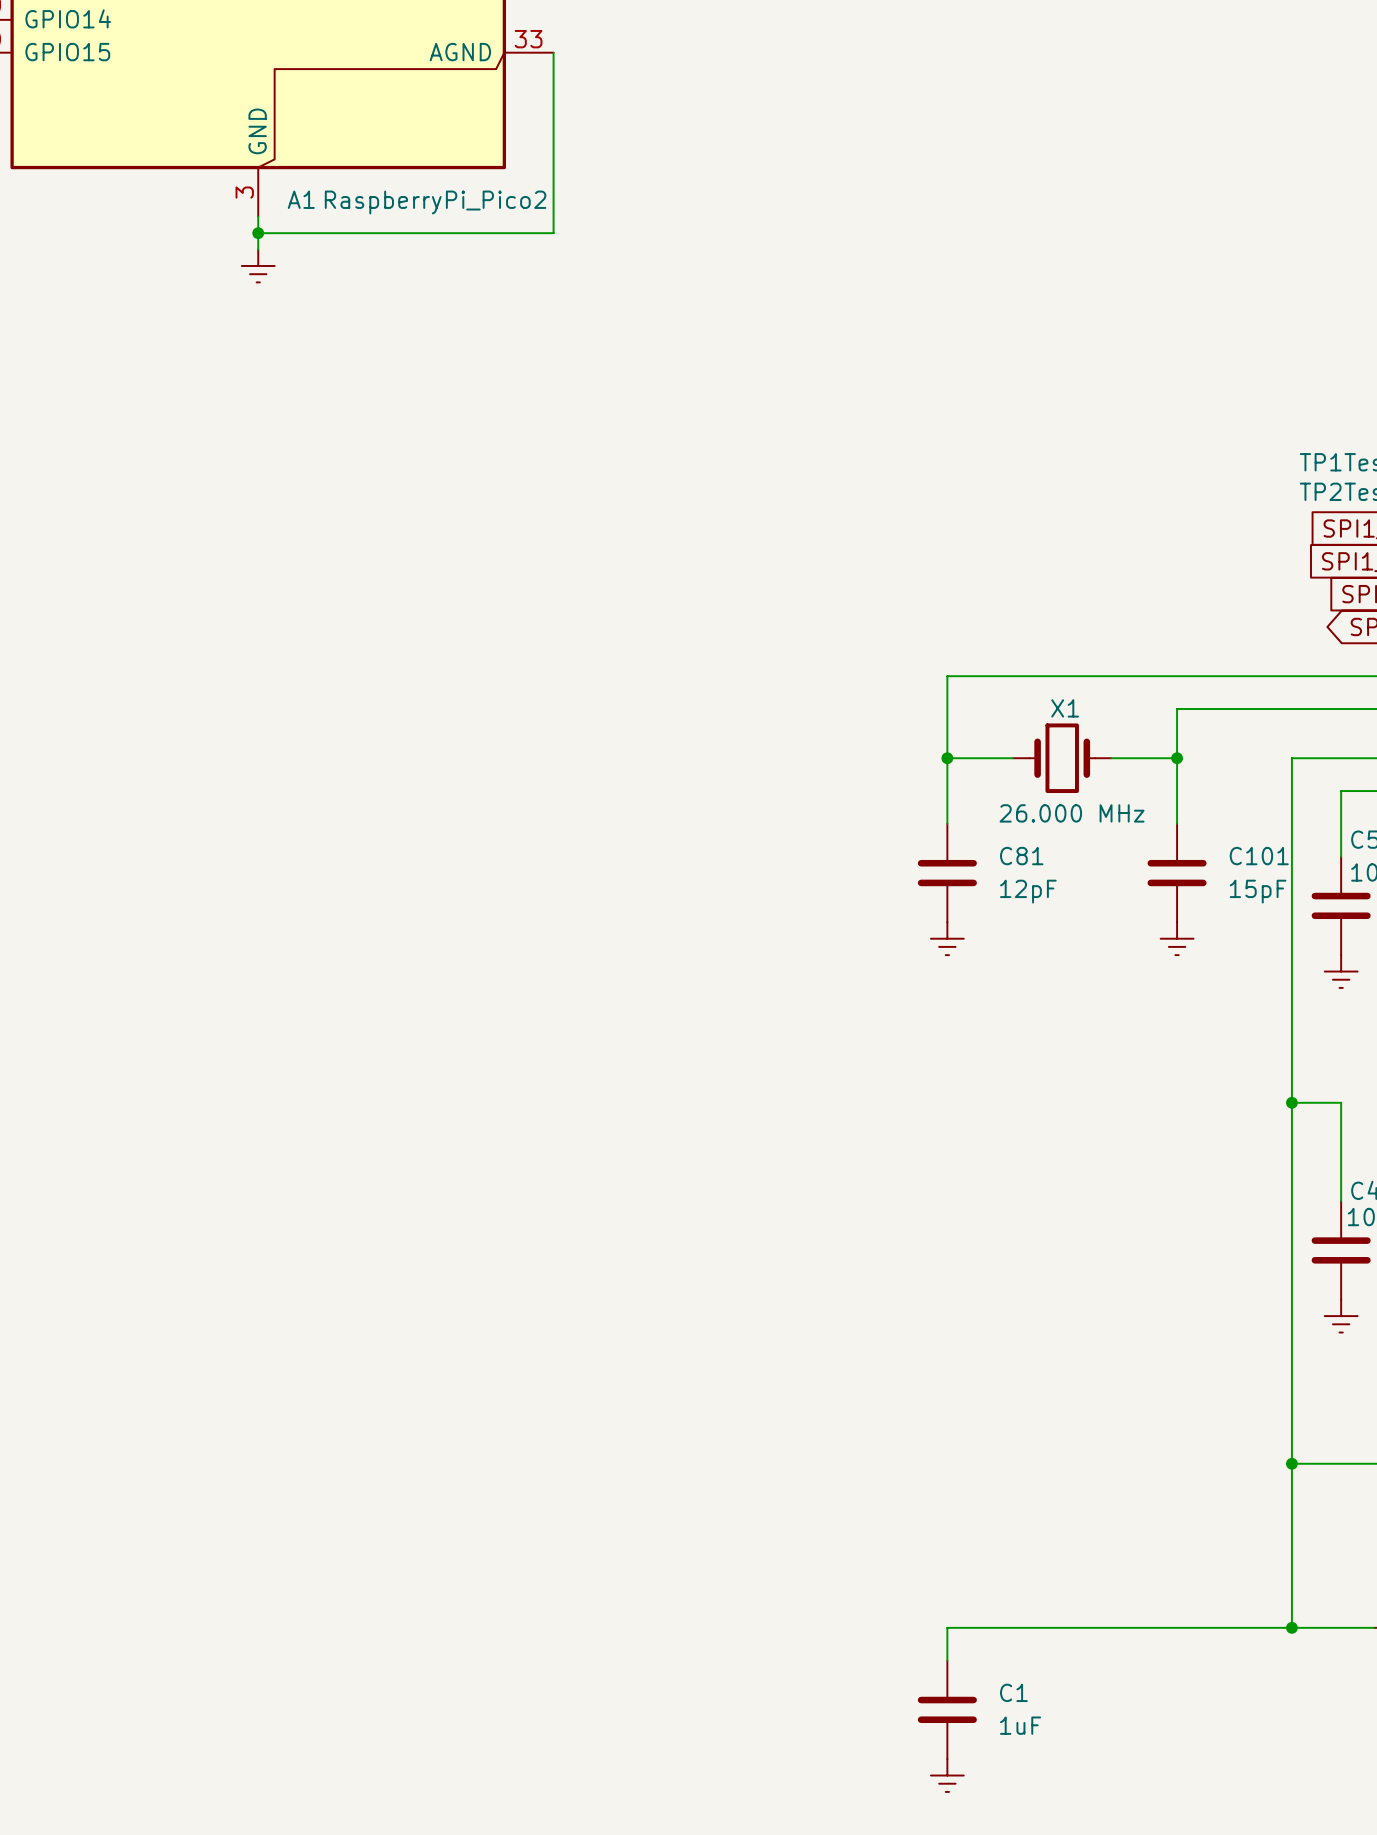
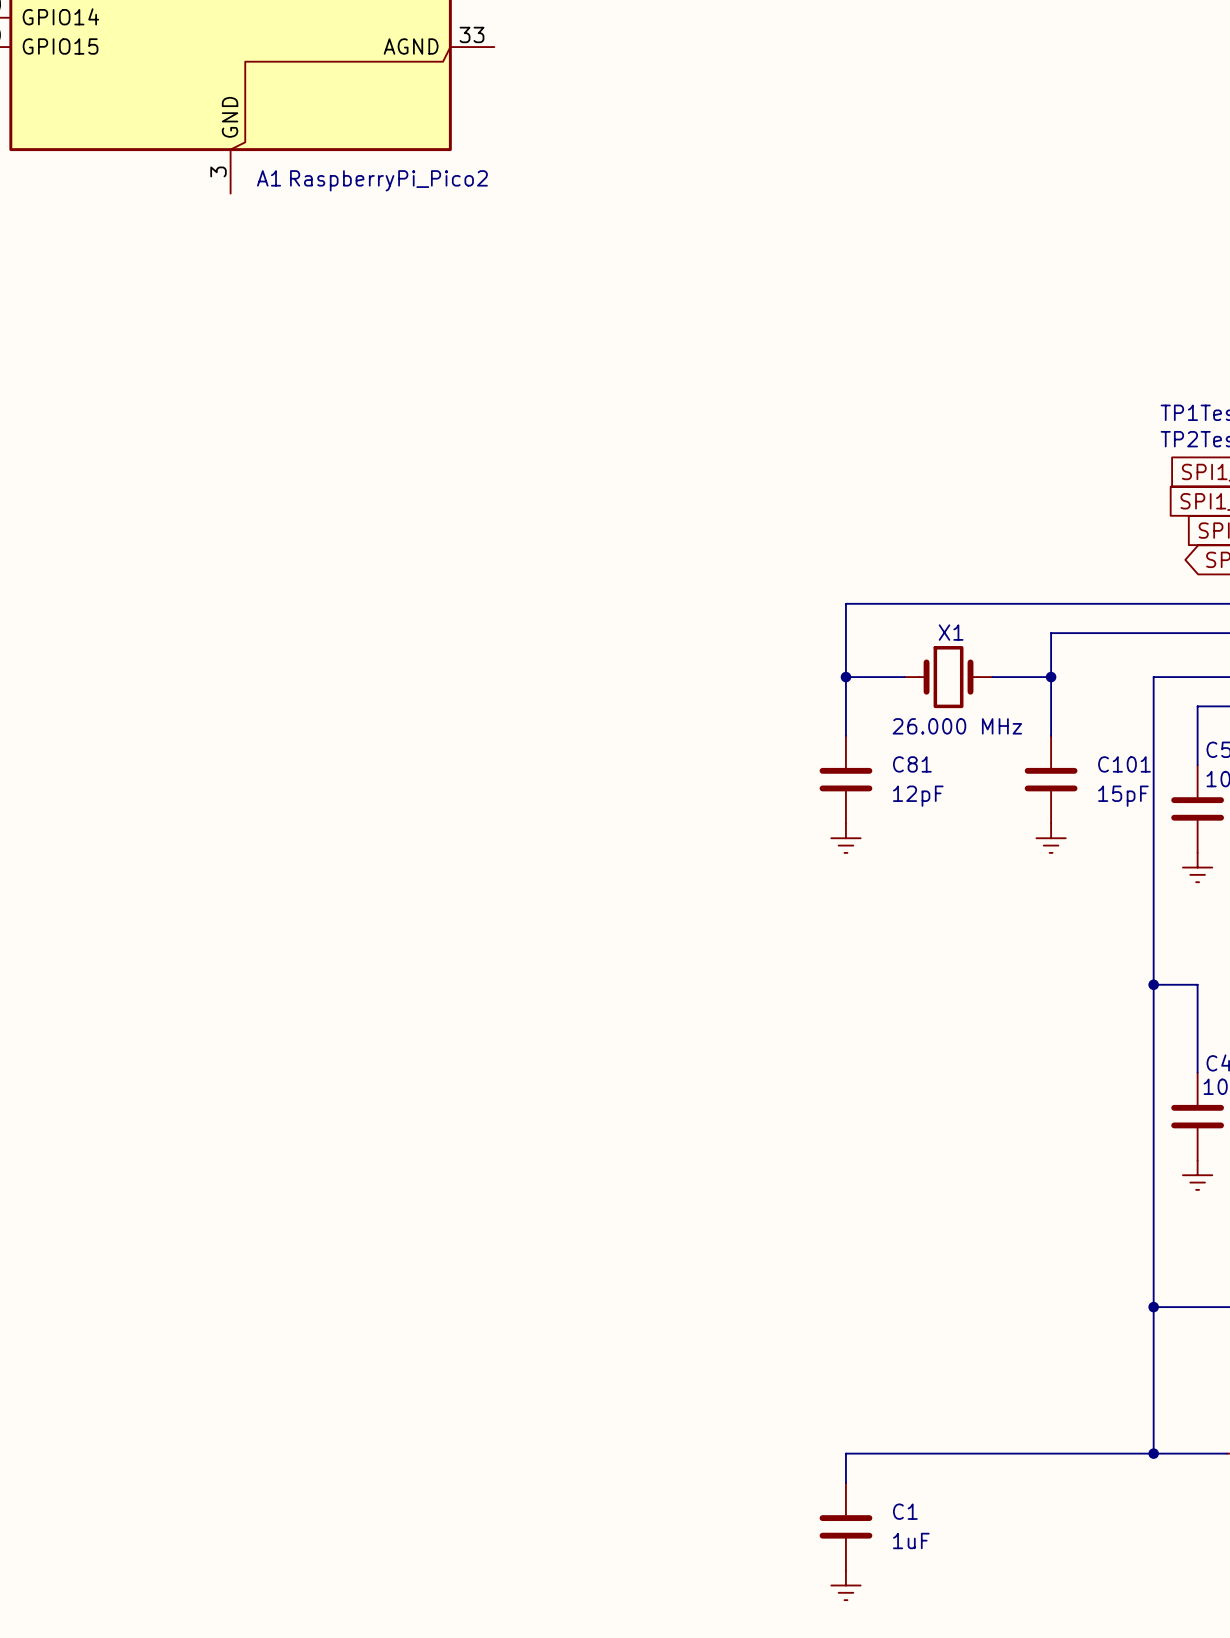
wire: (553, 52) (553, 233) (258, 233) -> none
wire: (258, 216) (258, 249) -> none
junction: (258, 233) -> none
power symbol: (258, 265) -> none

